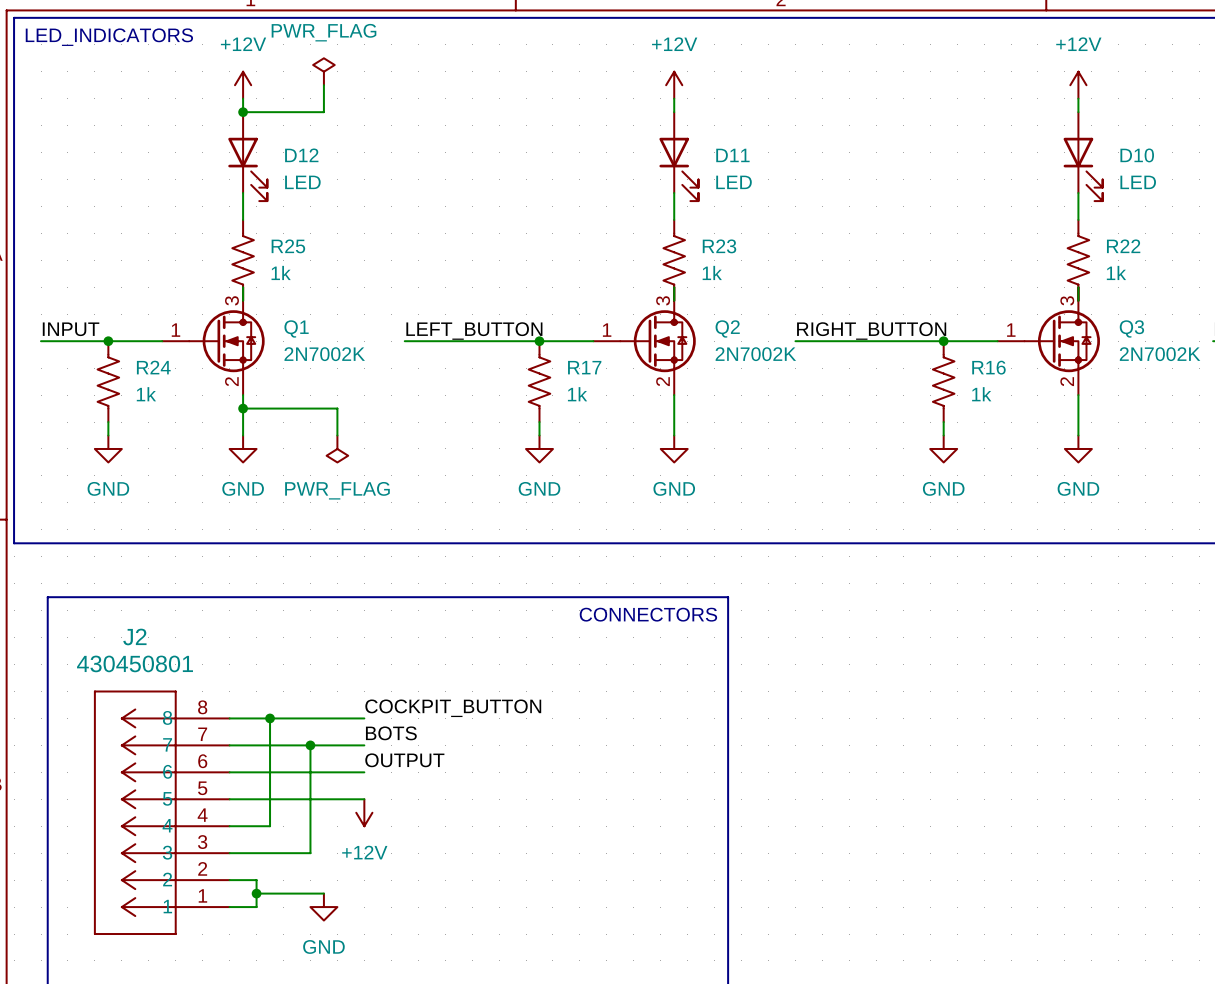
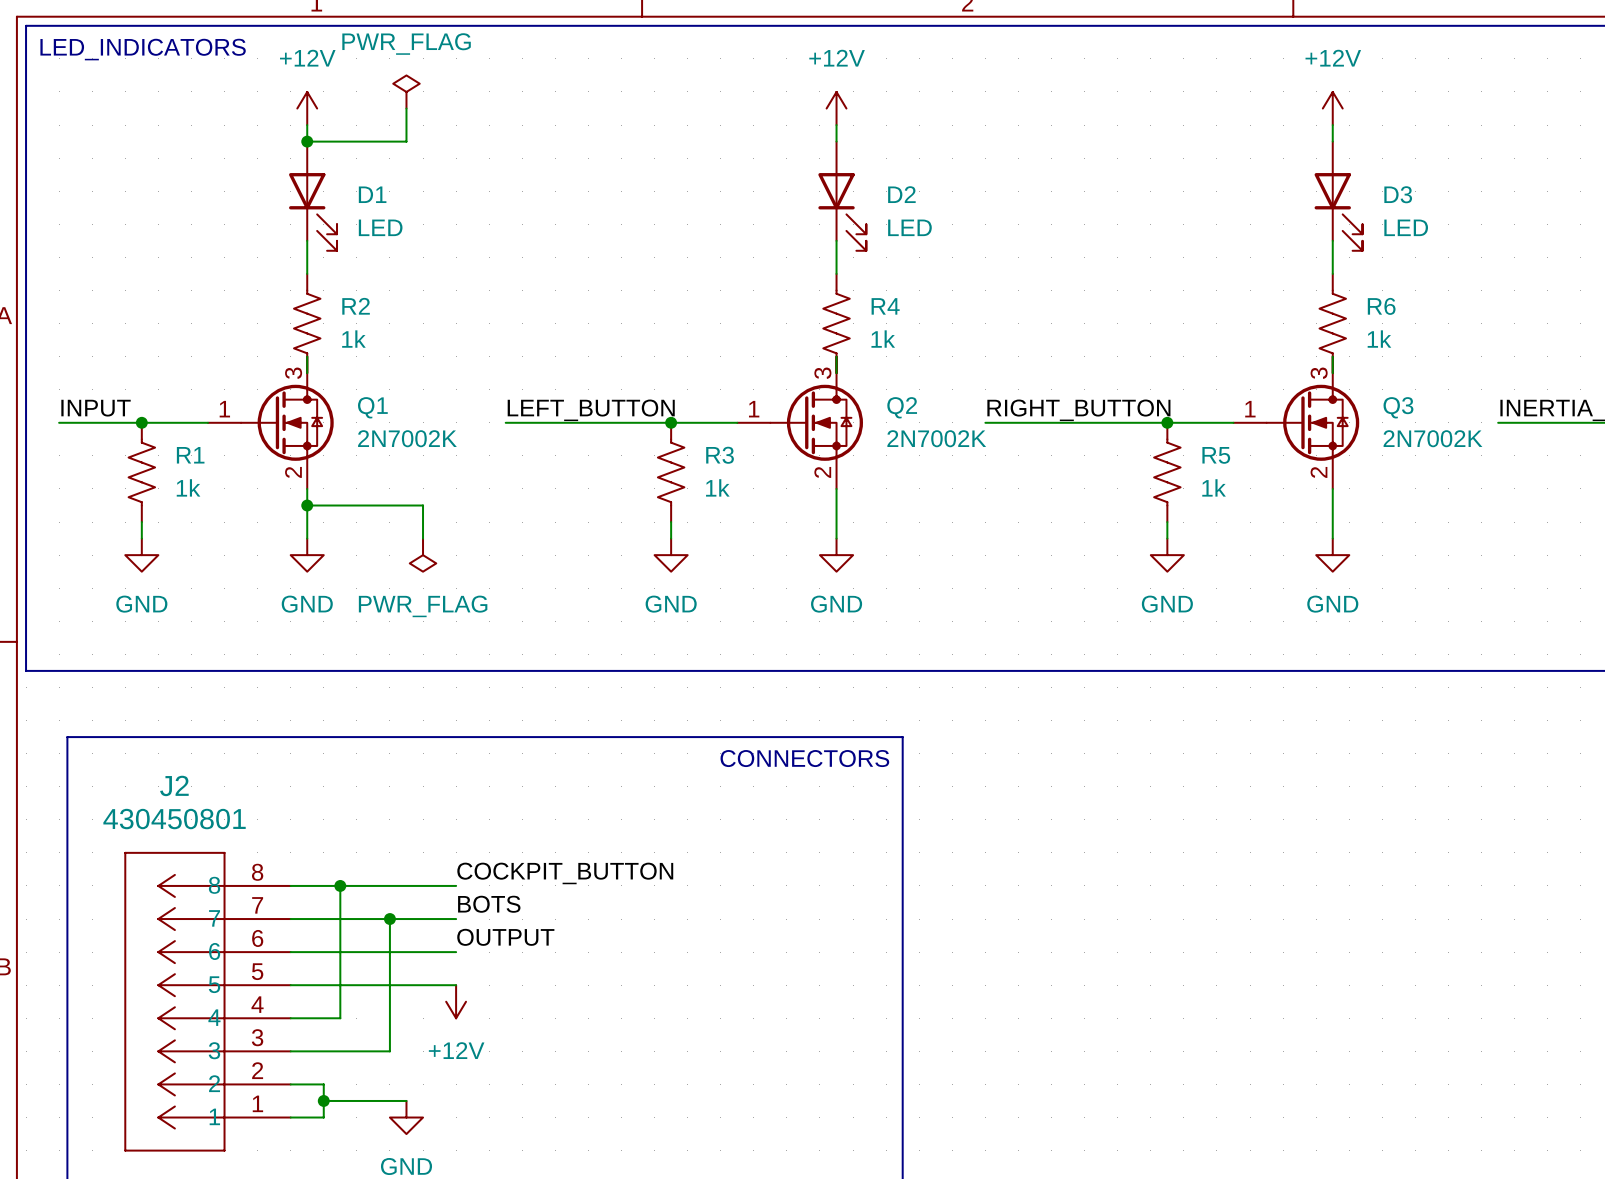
D12 name: D12 (301, 155) -> D1 (372, 194)
D11 name: D11 (732, 155) -> D2 (901, 194)
D10 name: D10 (1137, 155) -> D3 (1398, 194)
R25 name: R25 (288, 246) -> R2 (356, 306)
R23 name: R23 (719, 246) -> R4 (885, 306)
R22 name: R22 (1123, 246) -> R6 (1381, 306)
R24 name: R24 (153, 367) -> R1 (190, 455)
R17 name: R17 (584, 367) -> R3 (720, 455)
R16 name: R16 (988, 367) -> R5 (1216, 455)

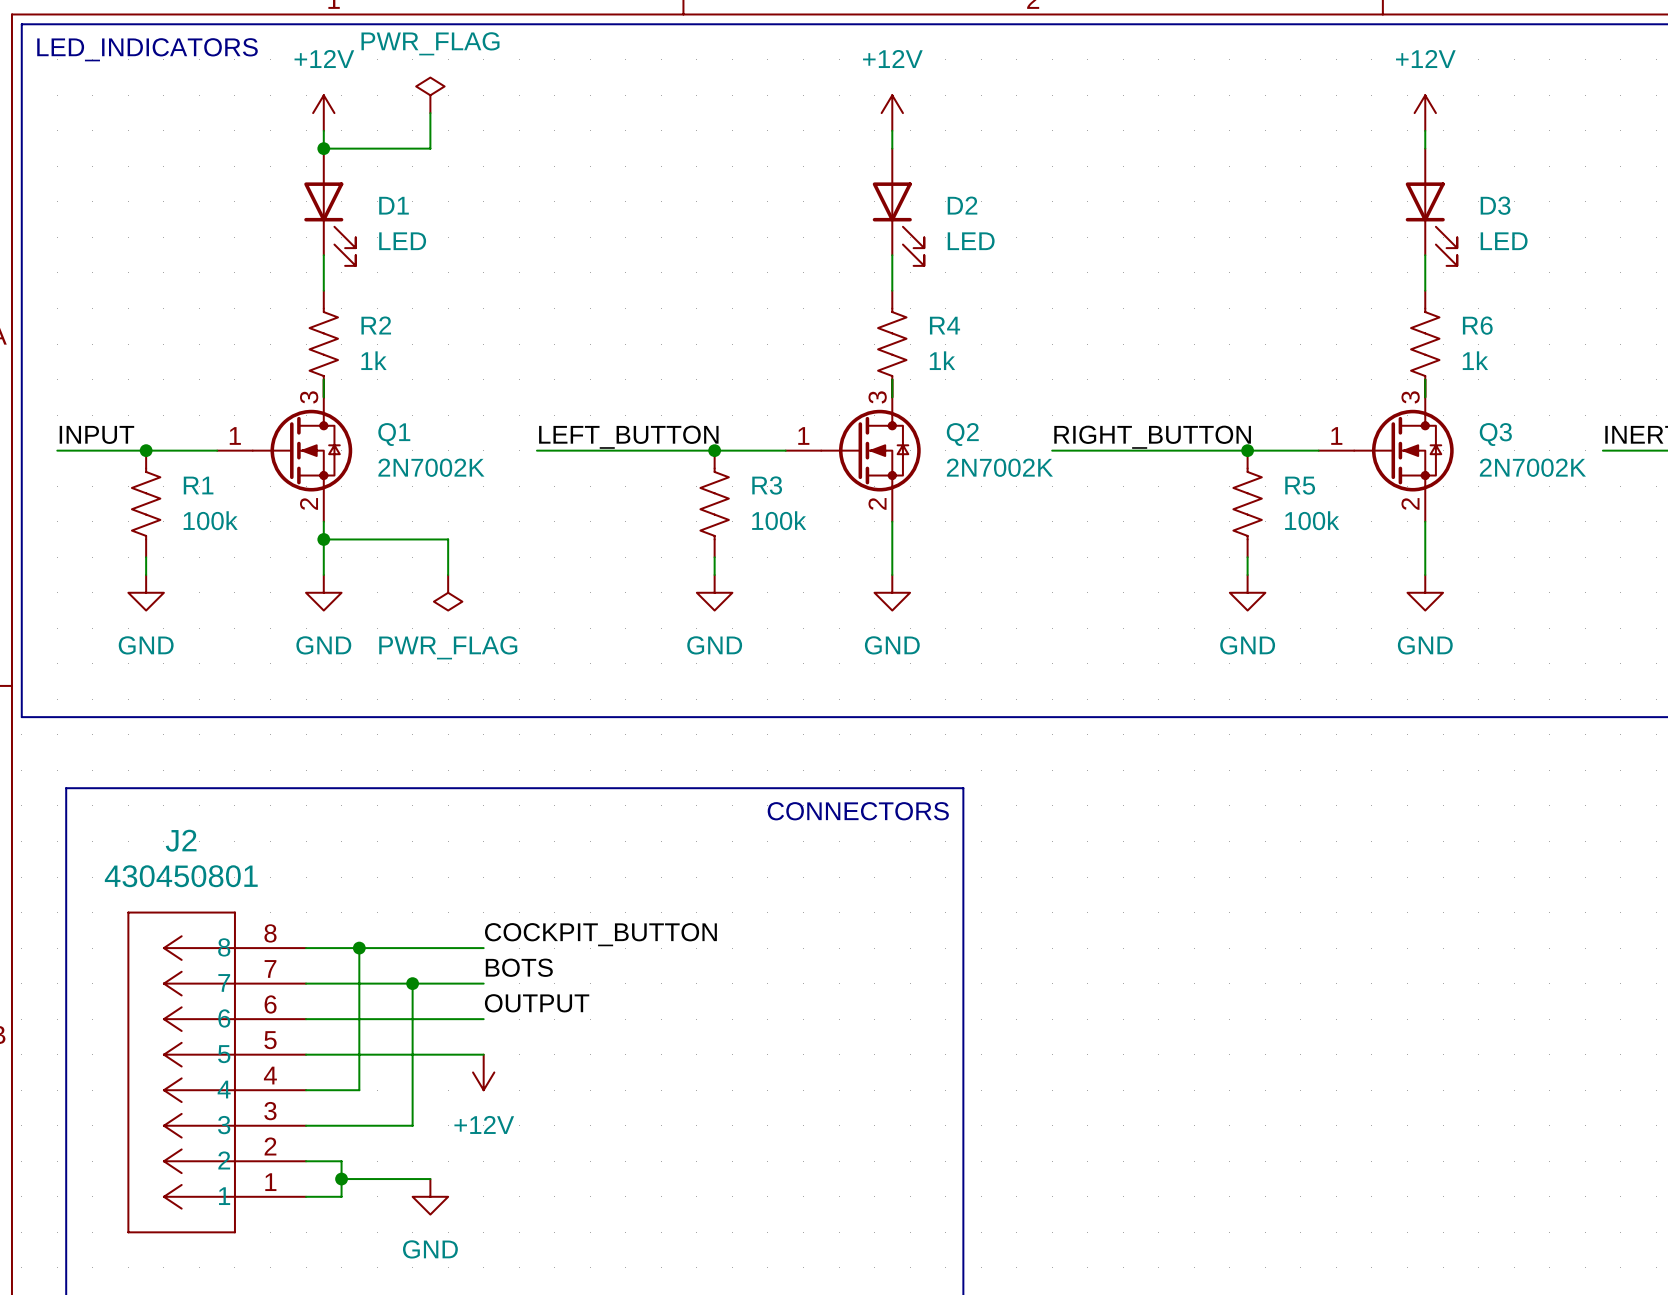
R1 value: 1k (188, 487) -> 100k (210, 520)
R3 value: 1k (717, 487) -> 100k (779, 520)
R5 value: 1k (1214, 487) -> 100k (1312, 520)

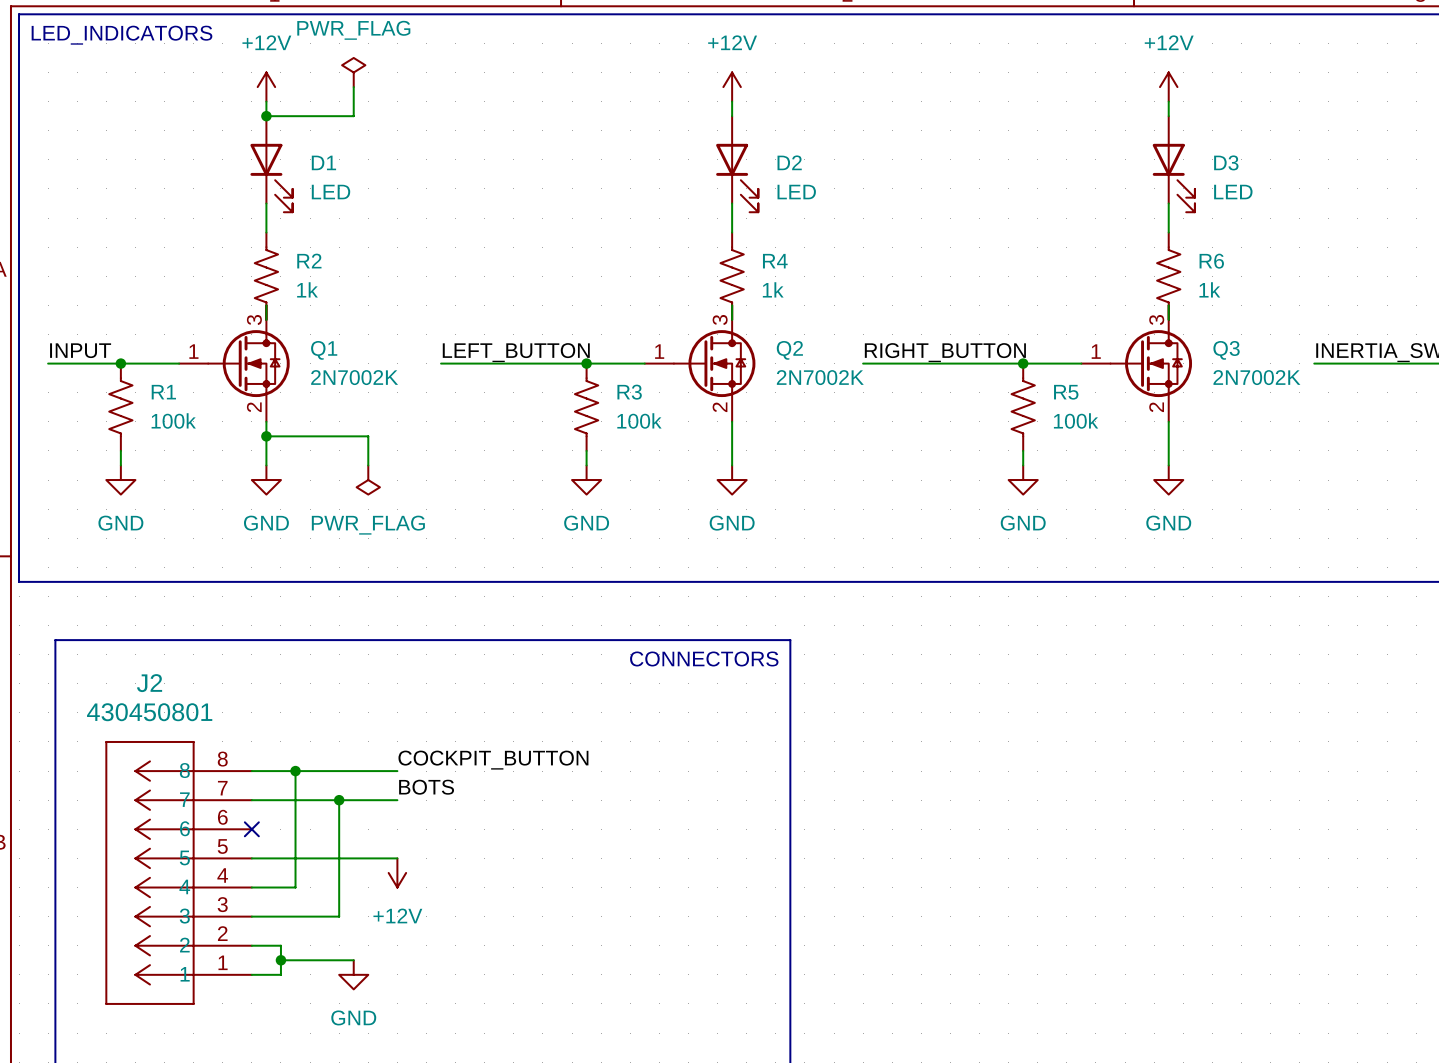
label: OUTPUT (537, 1003) -> none
wire: (306, 1019) (483, 1019) -> none
no-connect mark: none -> (251, 829)

